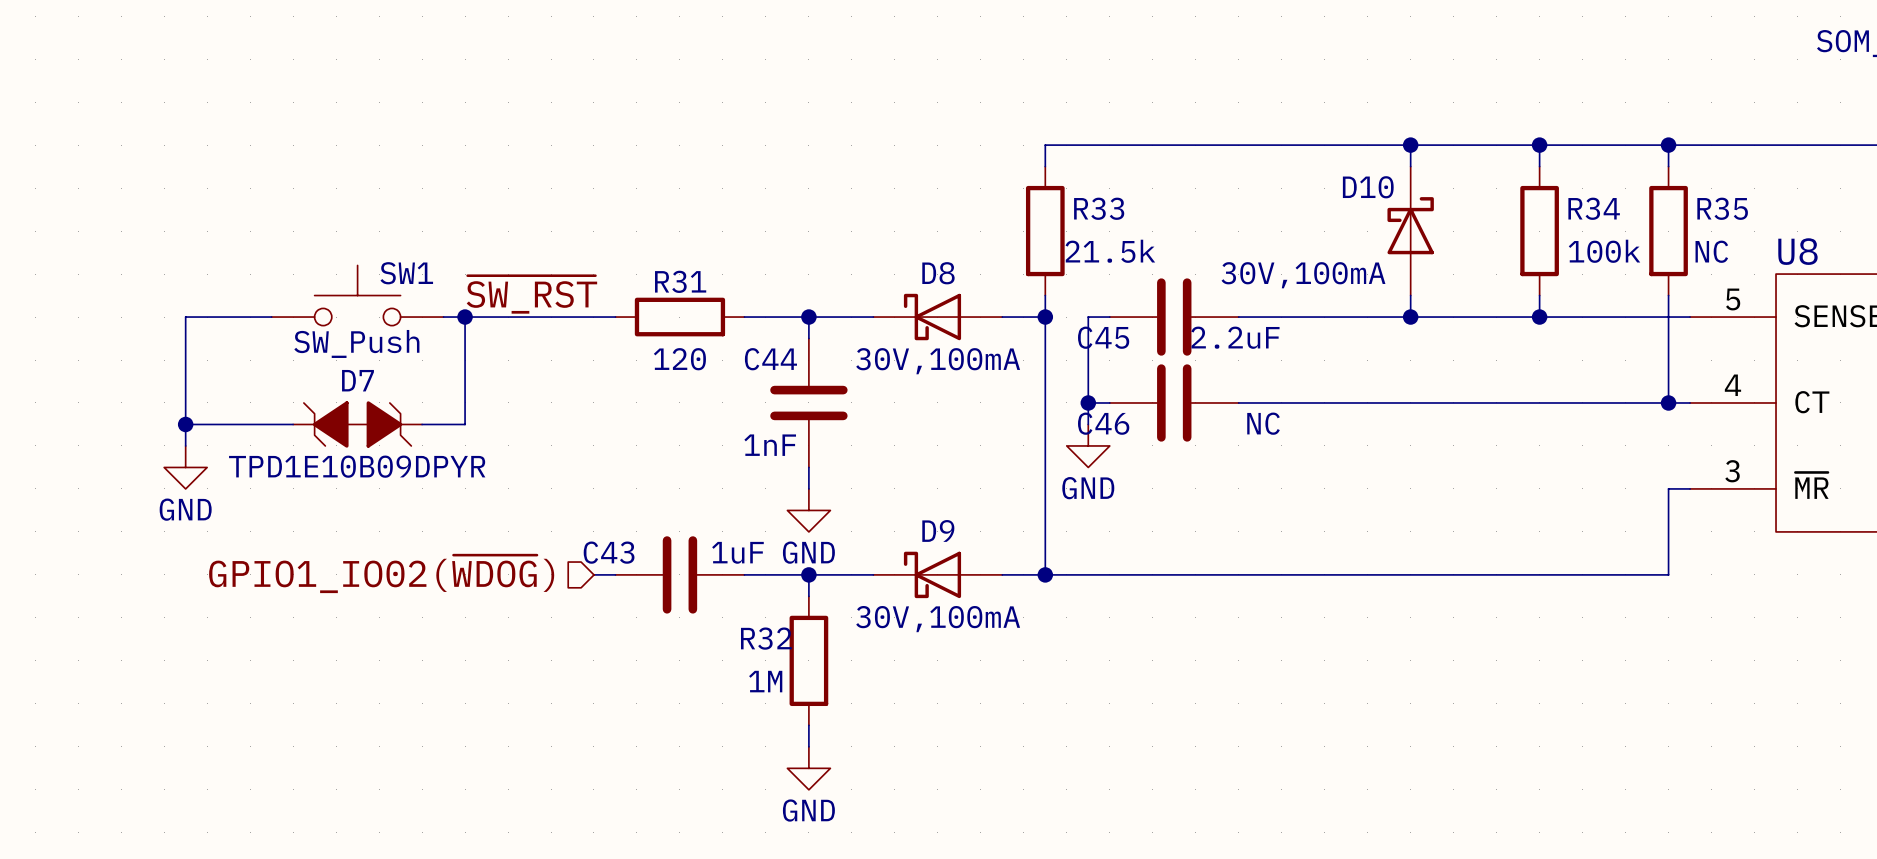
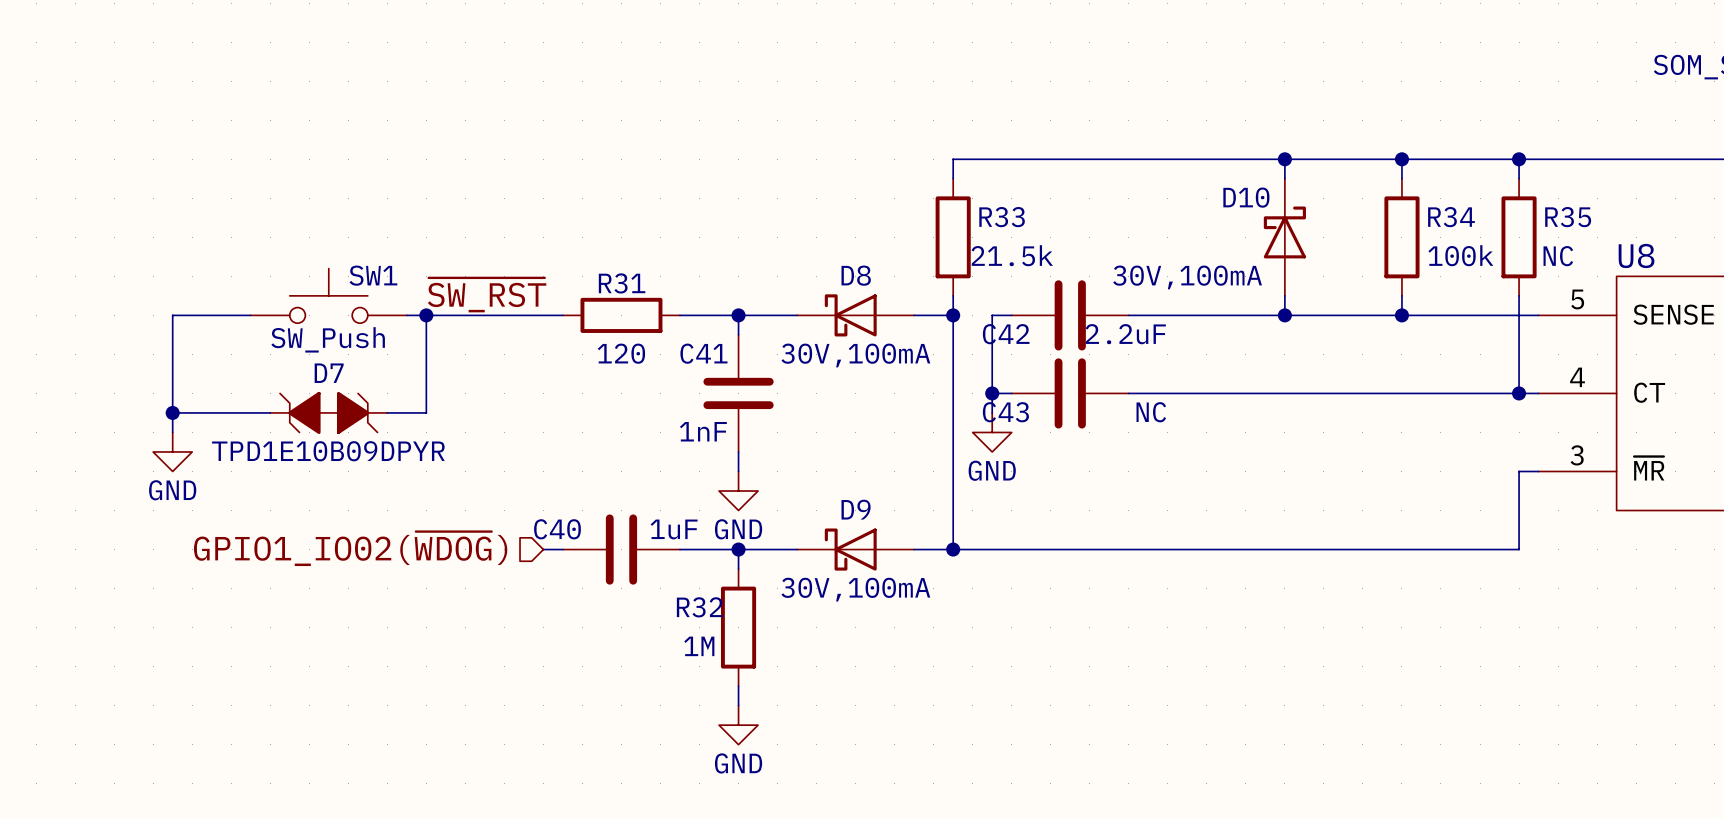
C45 name: C45 (1103, 337) -> C42 (1006, 334)
C44 name: C44 (770, 359) -> C41 (703, 353)
C46 name: C46 (1103, 423) -> C43 (1005, 412)
C43 name: C43 (609, 552) -> C40 (557, 529)

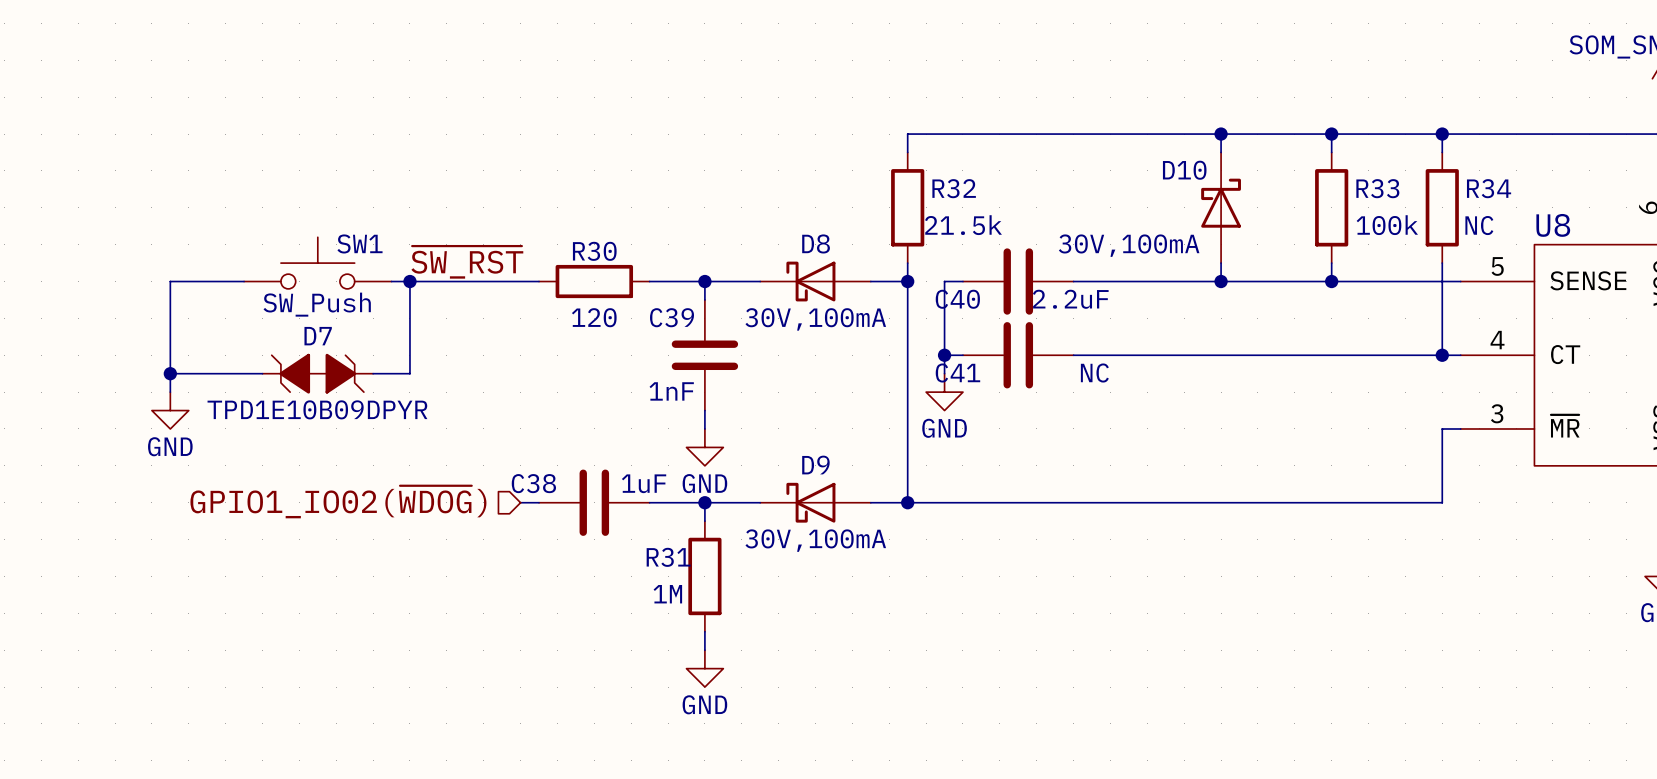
R33 name: R33 (1002, 217) -> R32 (954, 188)
R34 name: R34 (1451, 217) -> R33 (1377, 188)
R35 name: R35 (1568, 217) -> R34 (1489, 188)
R31 name: R31 (622, 283) -> R30 (594, 251)
C42 name: C42 (1006, 334) -> C40 (957, 299)
C41 name: C41 (703, 353) -> C39 (672, 317)
C43 name: C43 (1005, 412) -> C41 (957, 373)
C40 name: C40 (557, 529) -> C38 (533, 483)
R32 name: R32 (699, 607) -> R31 (668, 557)

